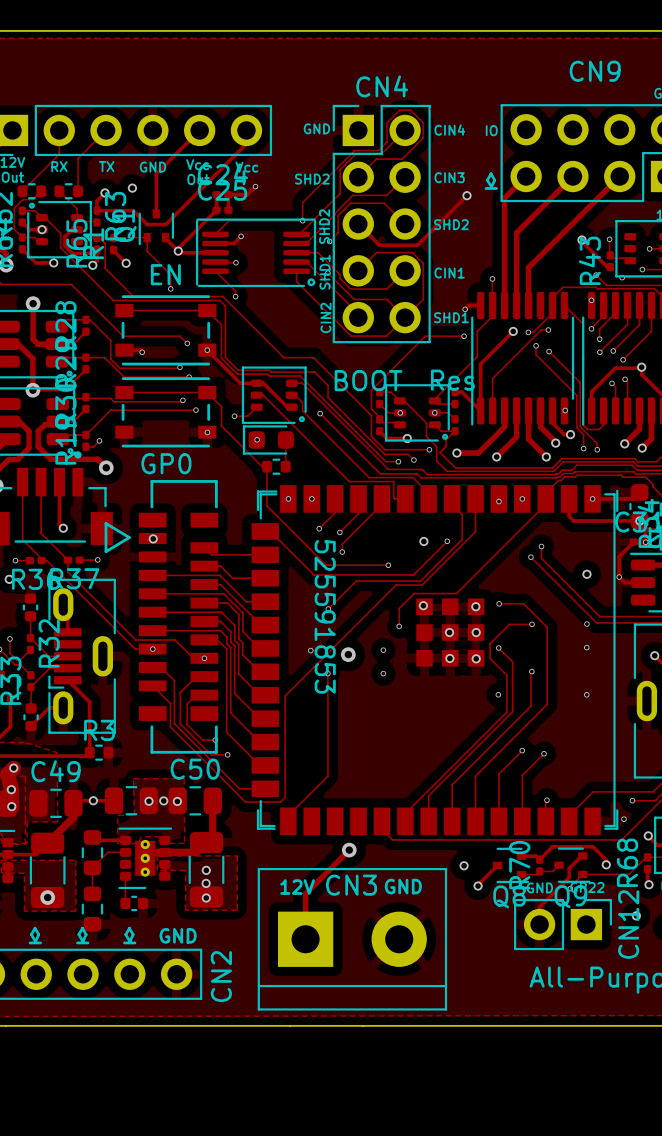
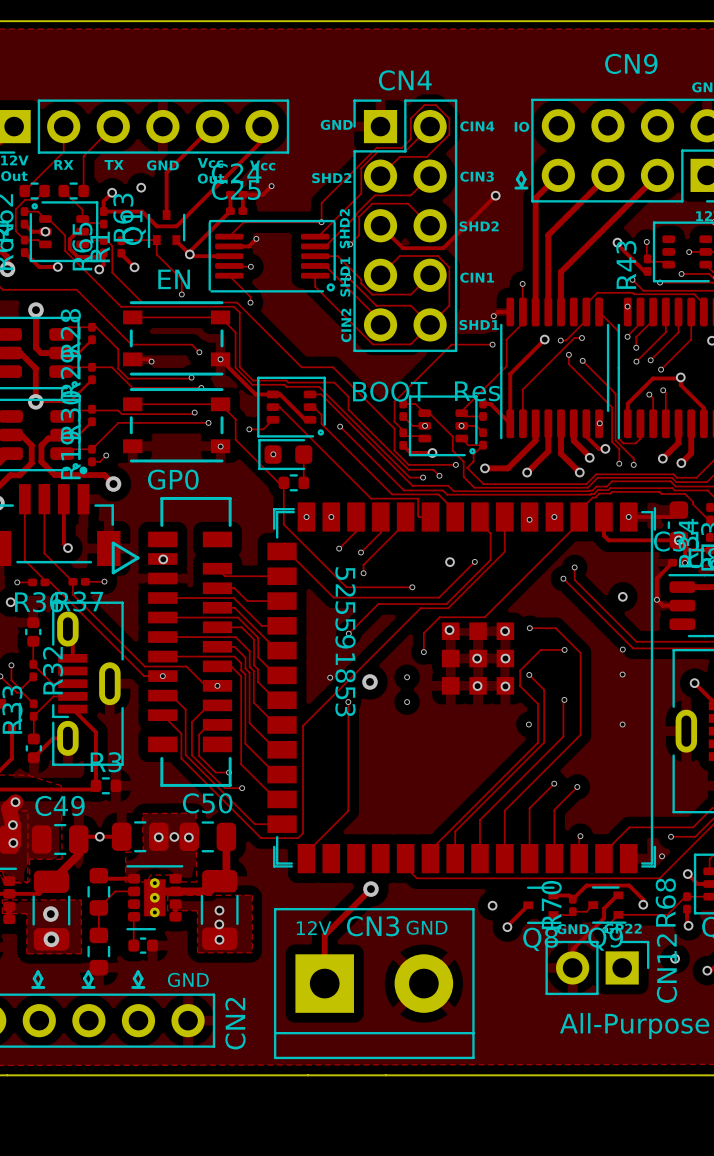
via: none -> (50, 914)

